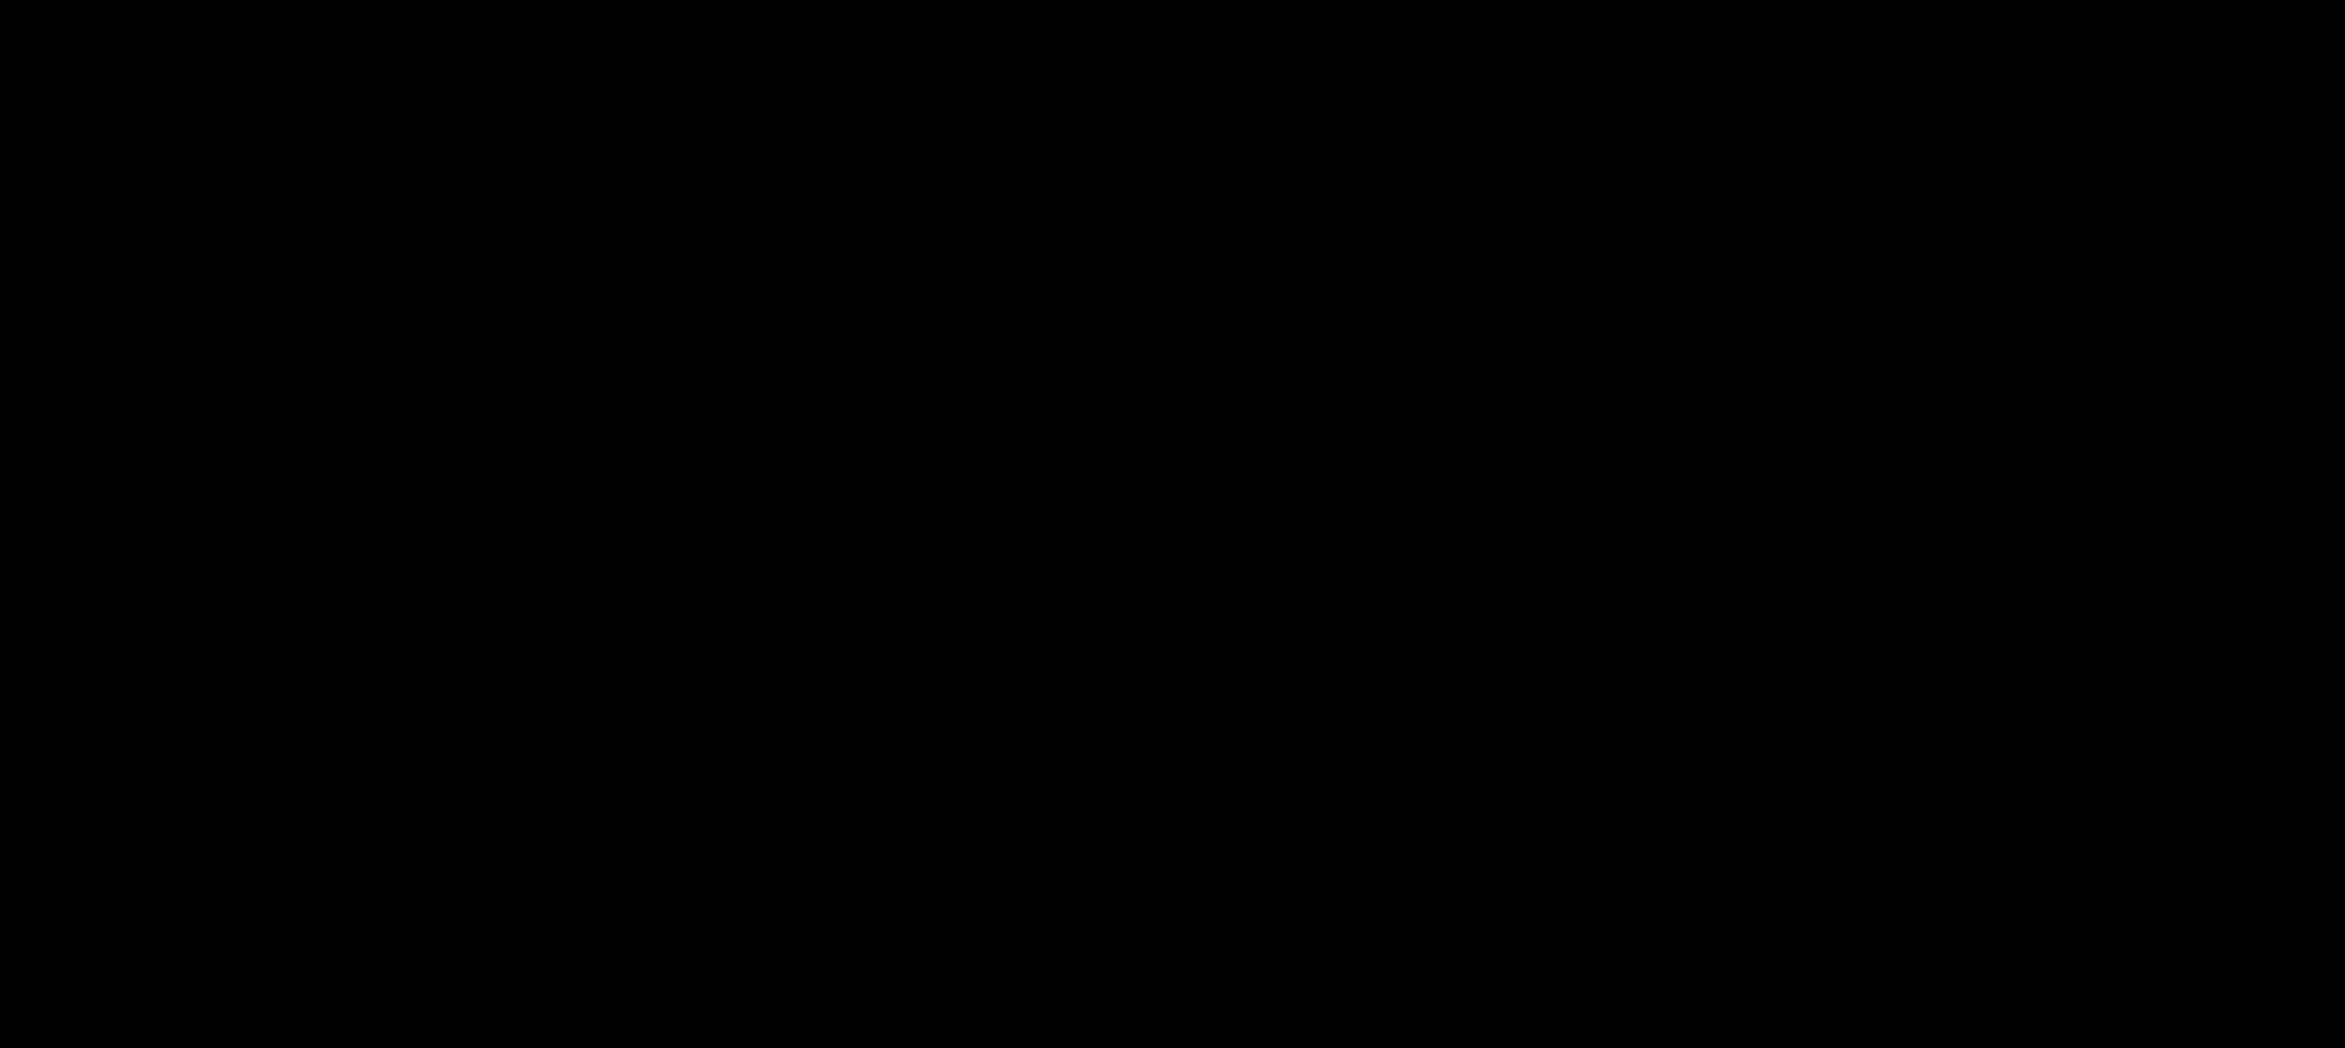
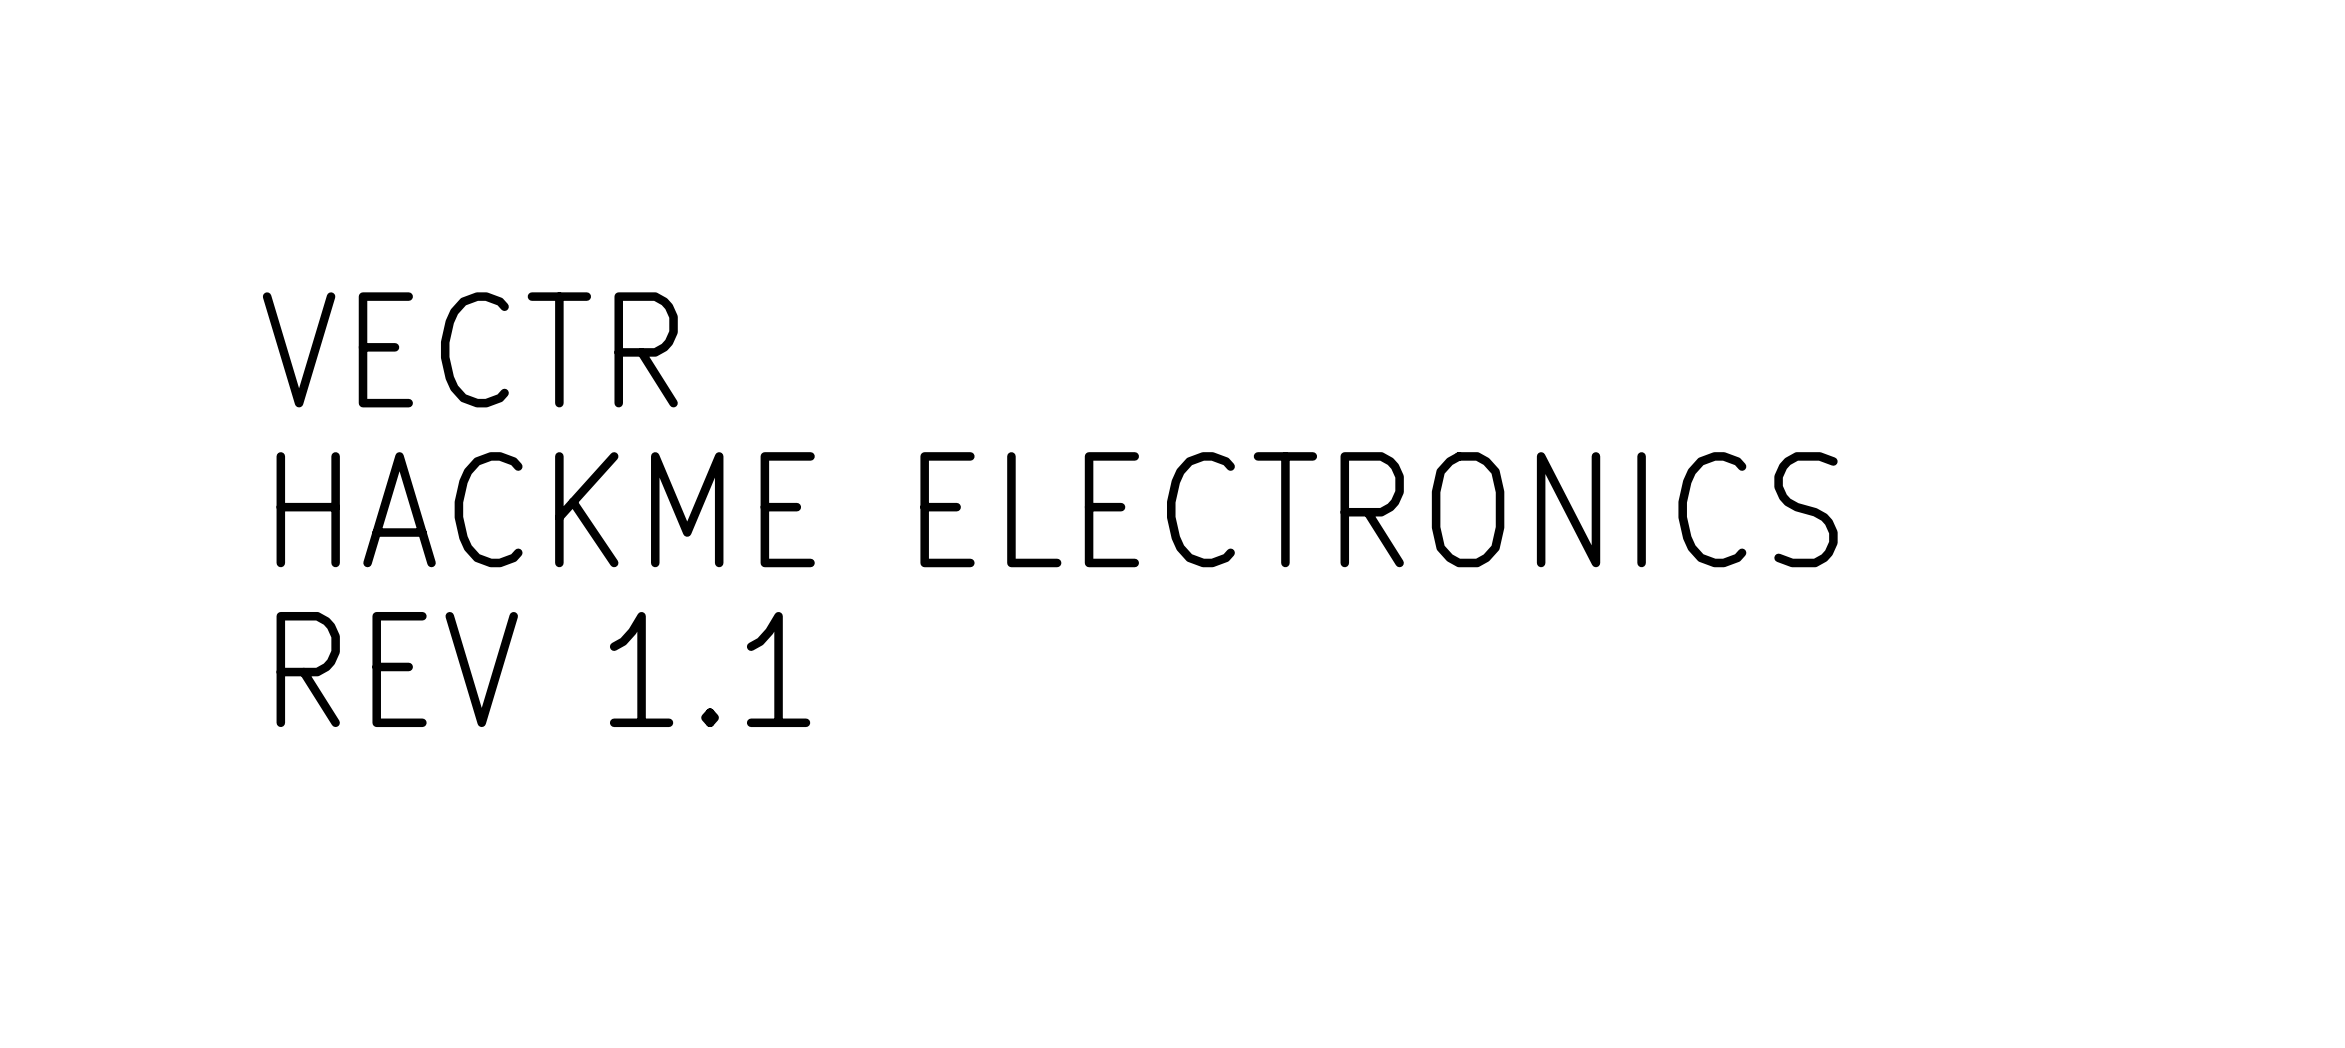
text: none -> VECTR (470, 349)
text: none -> HACKME ELECTRONICS (1057, 509)
text: none -> REV 1.1 (543, 669)

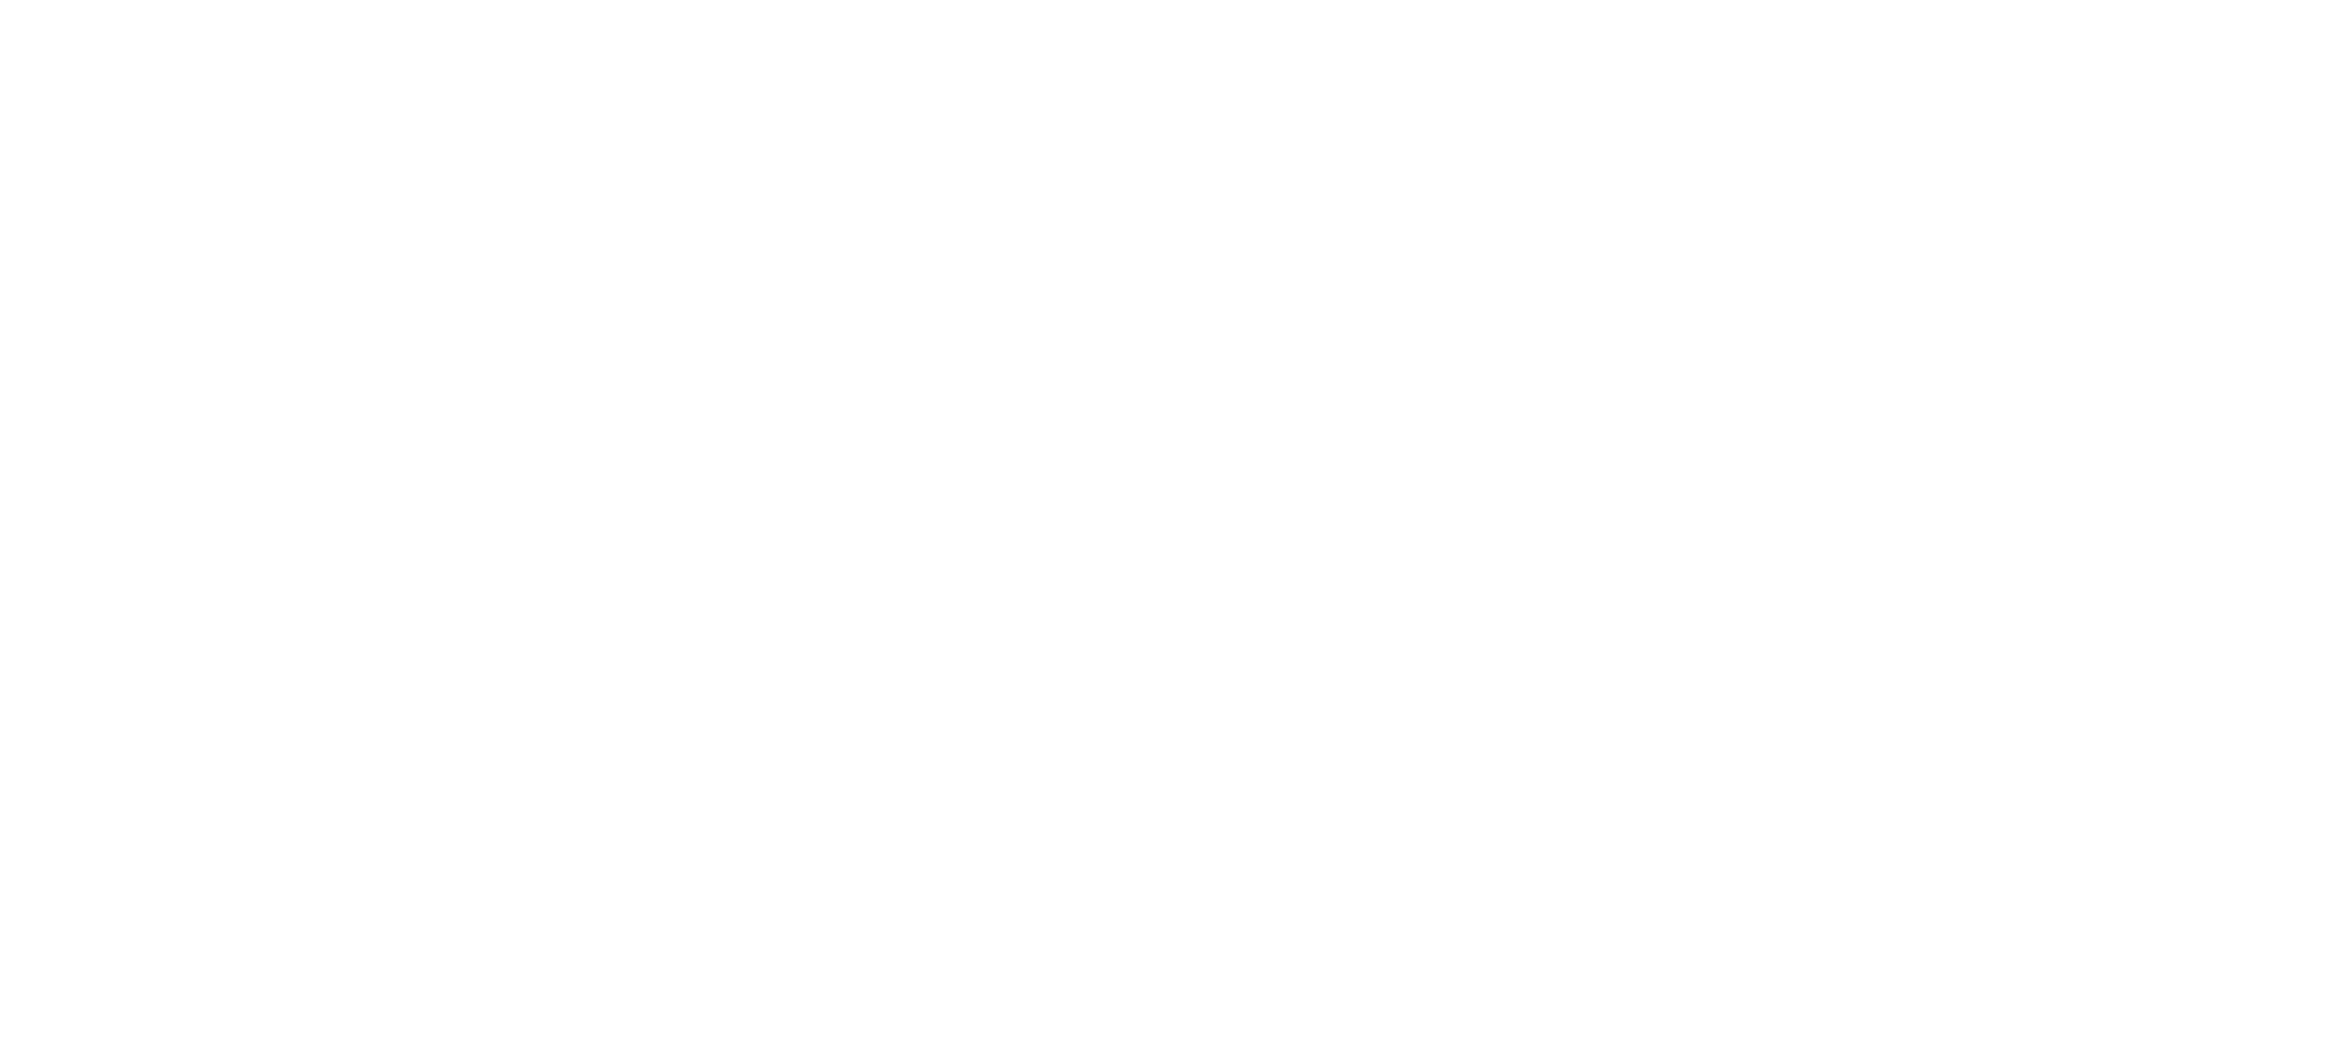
text: VECTR (470, 349) -> none
text: HACKME ELECTRONICS (1057, 509) -> none
text: REV 1.1 (543, 669) -> none

